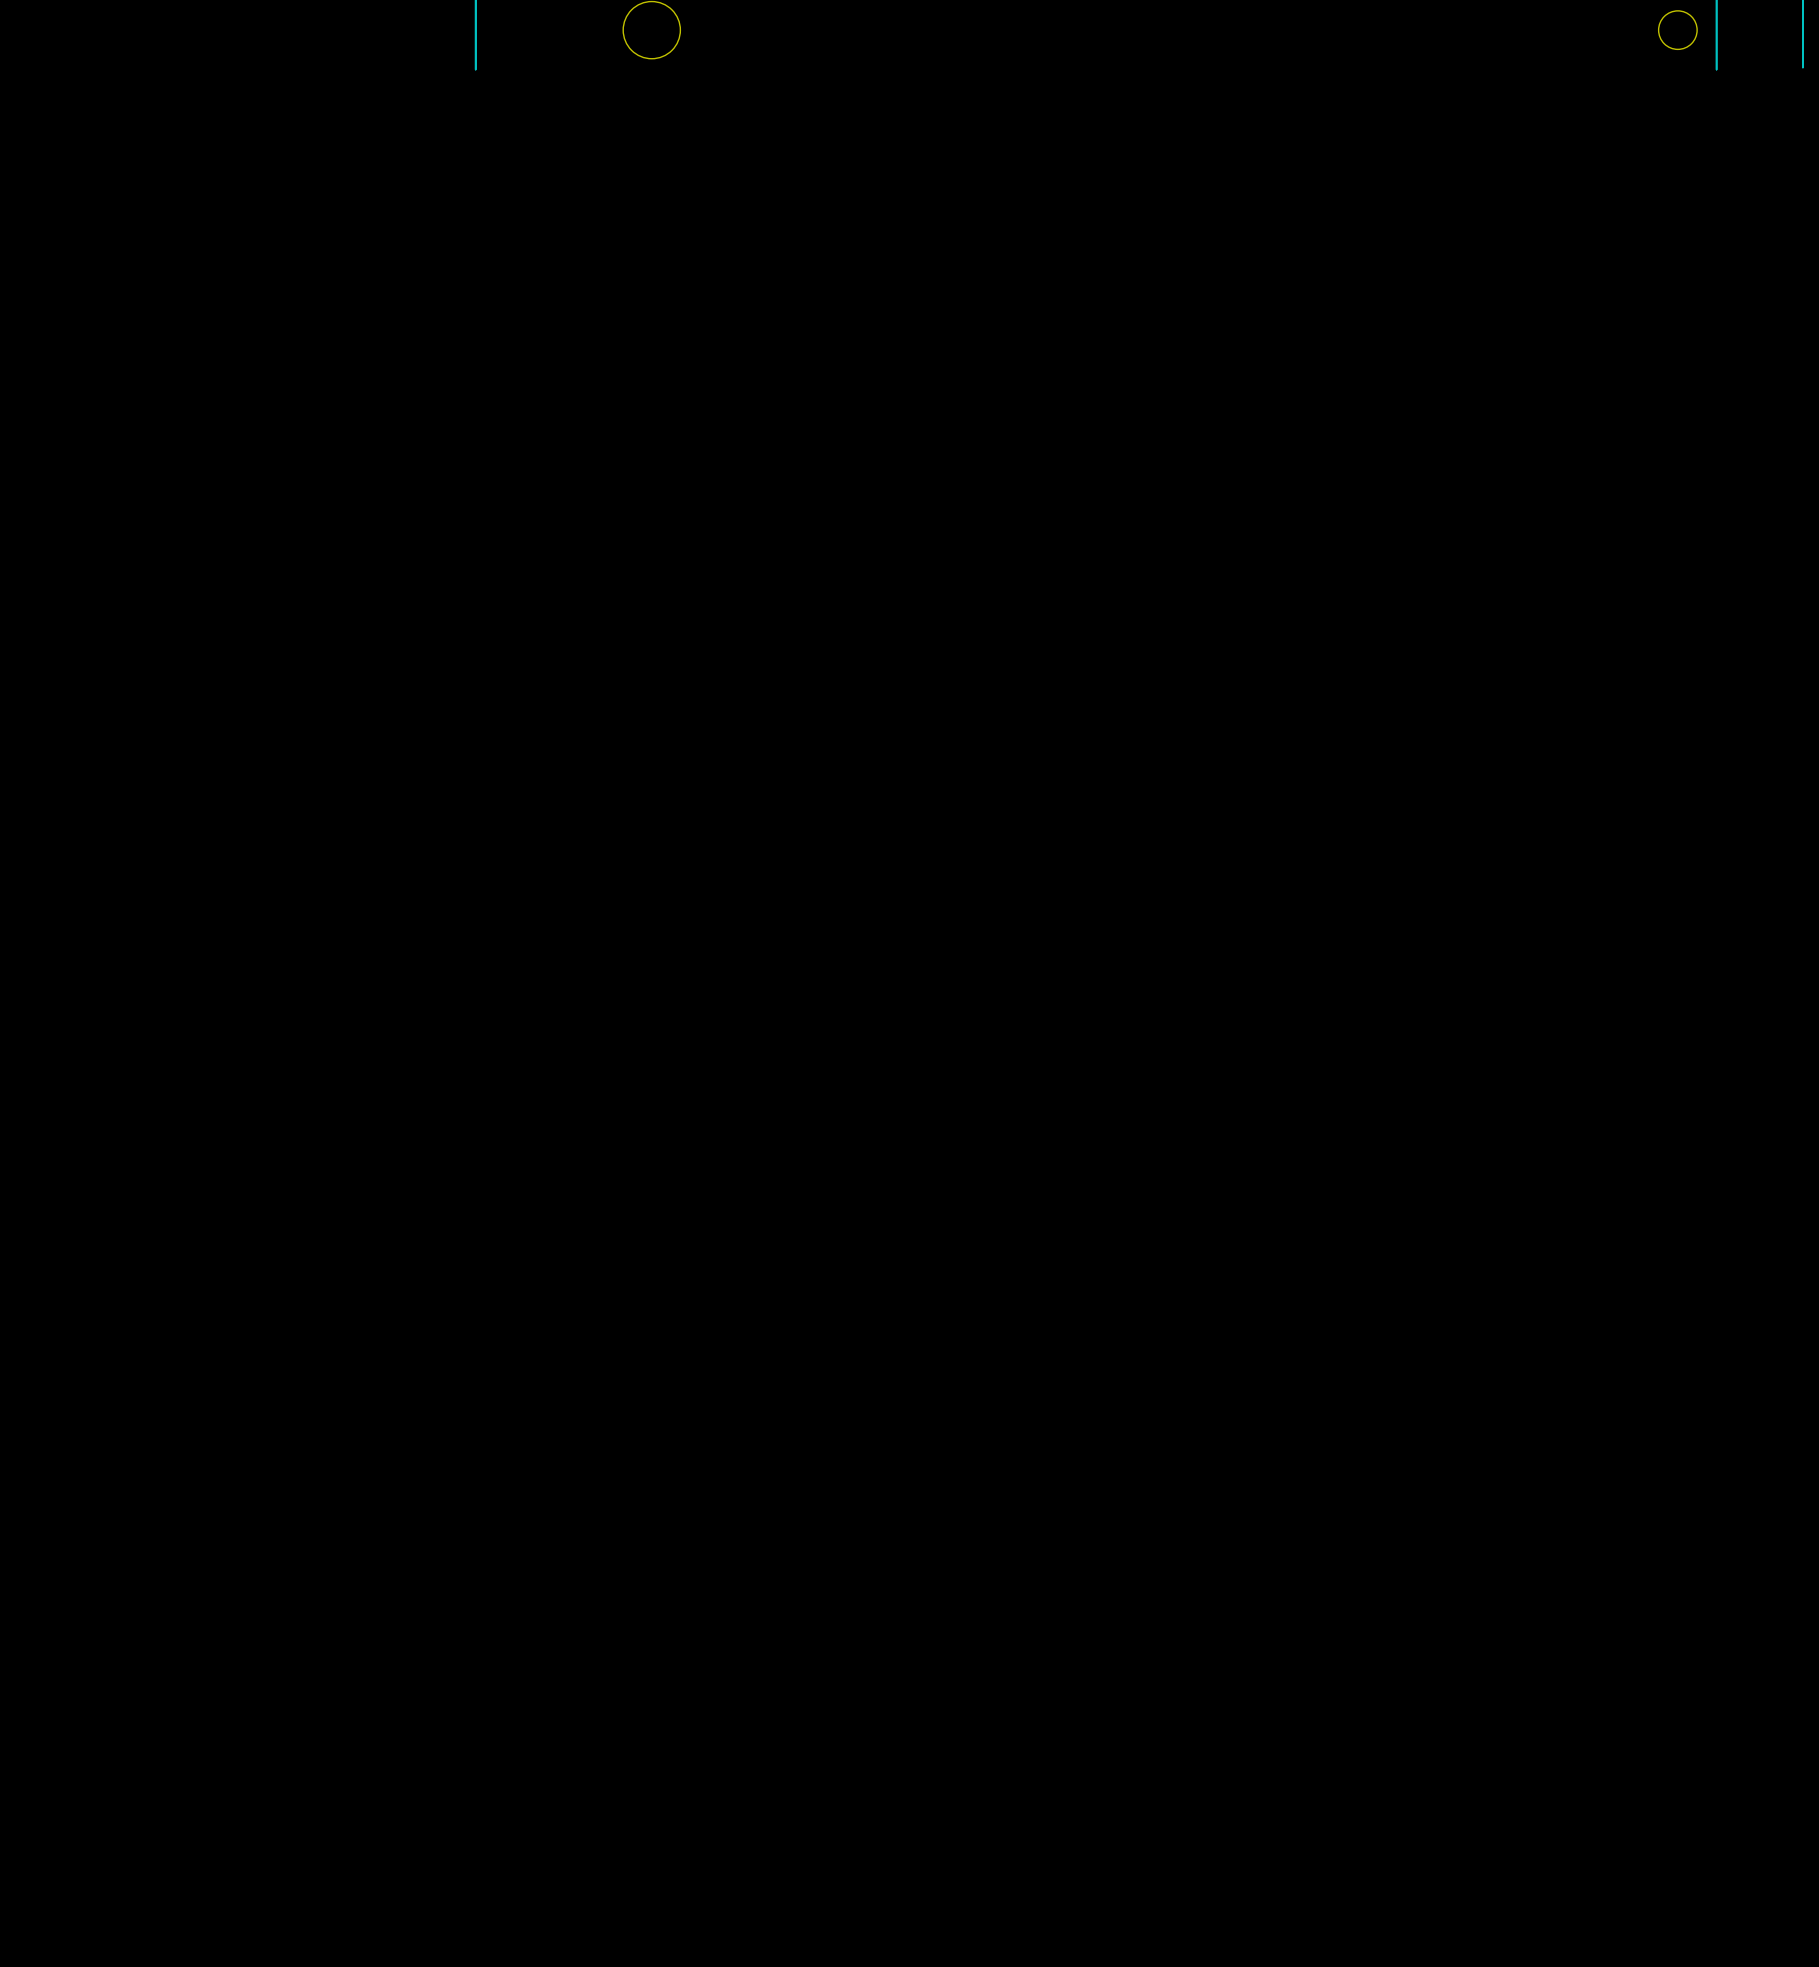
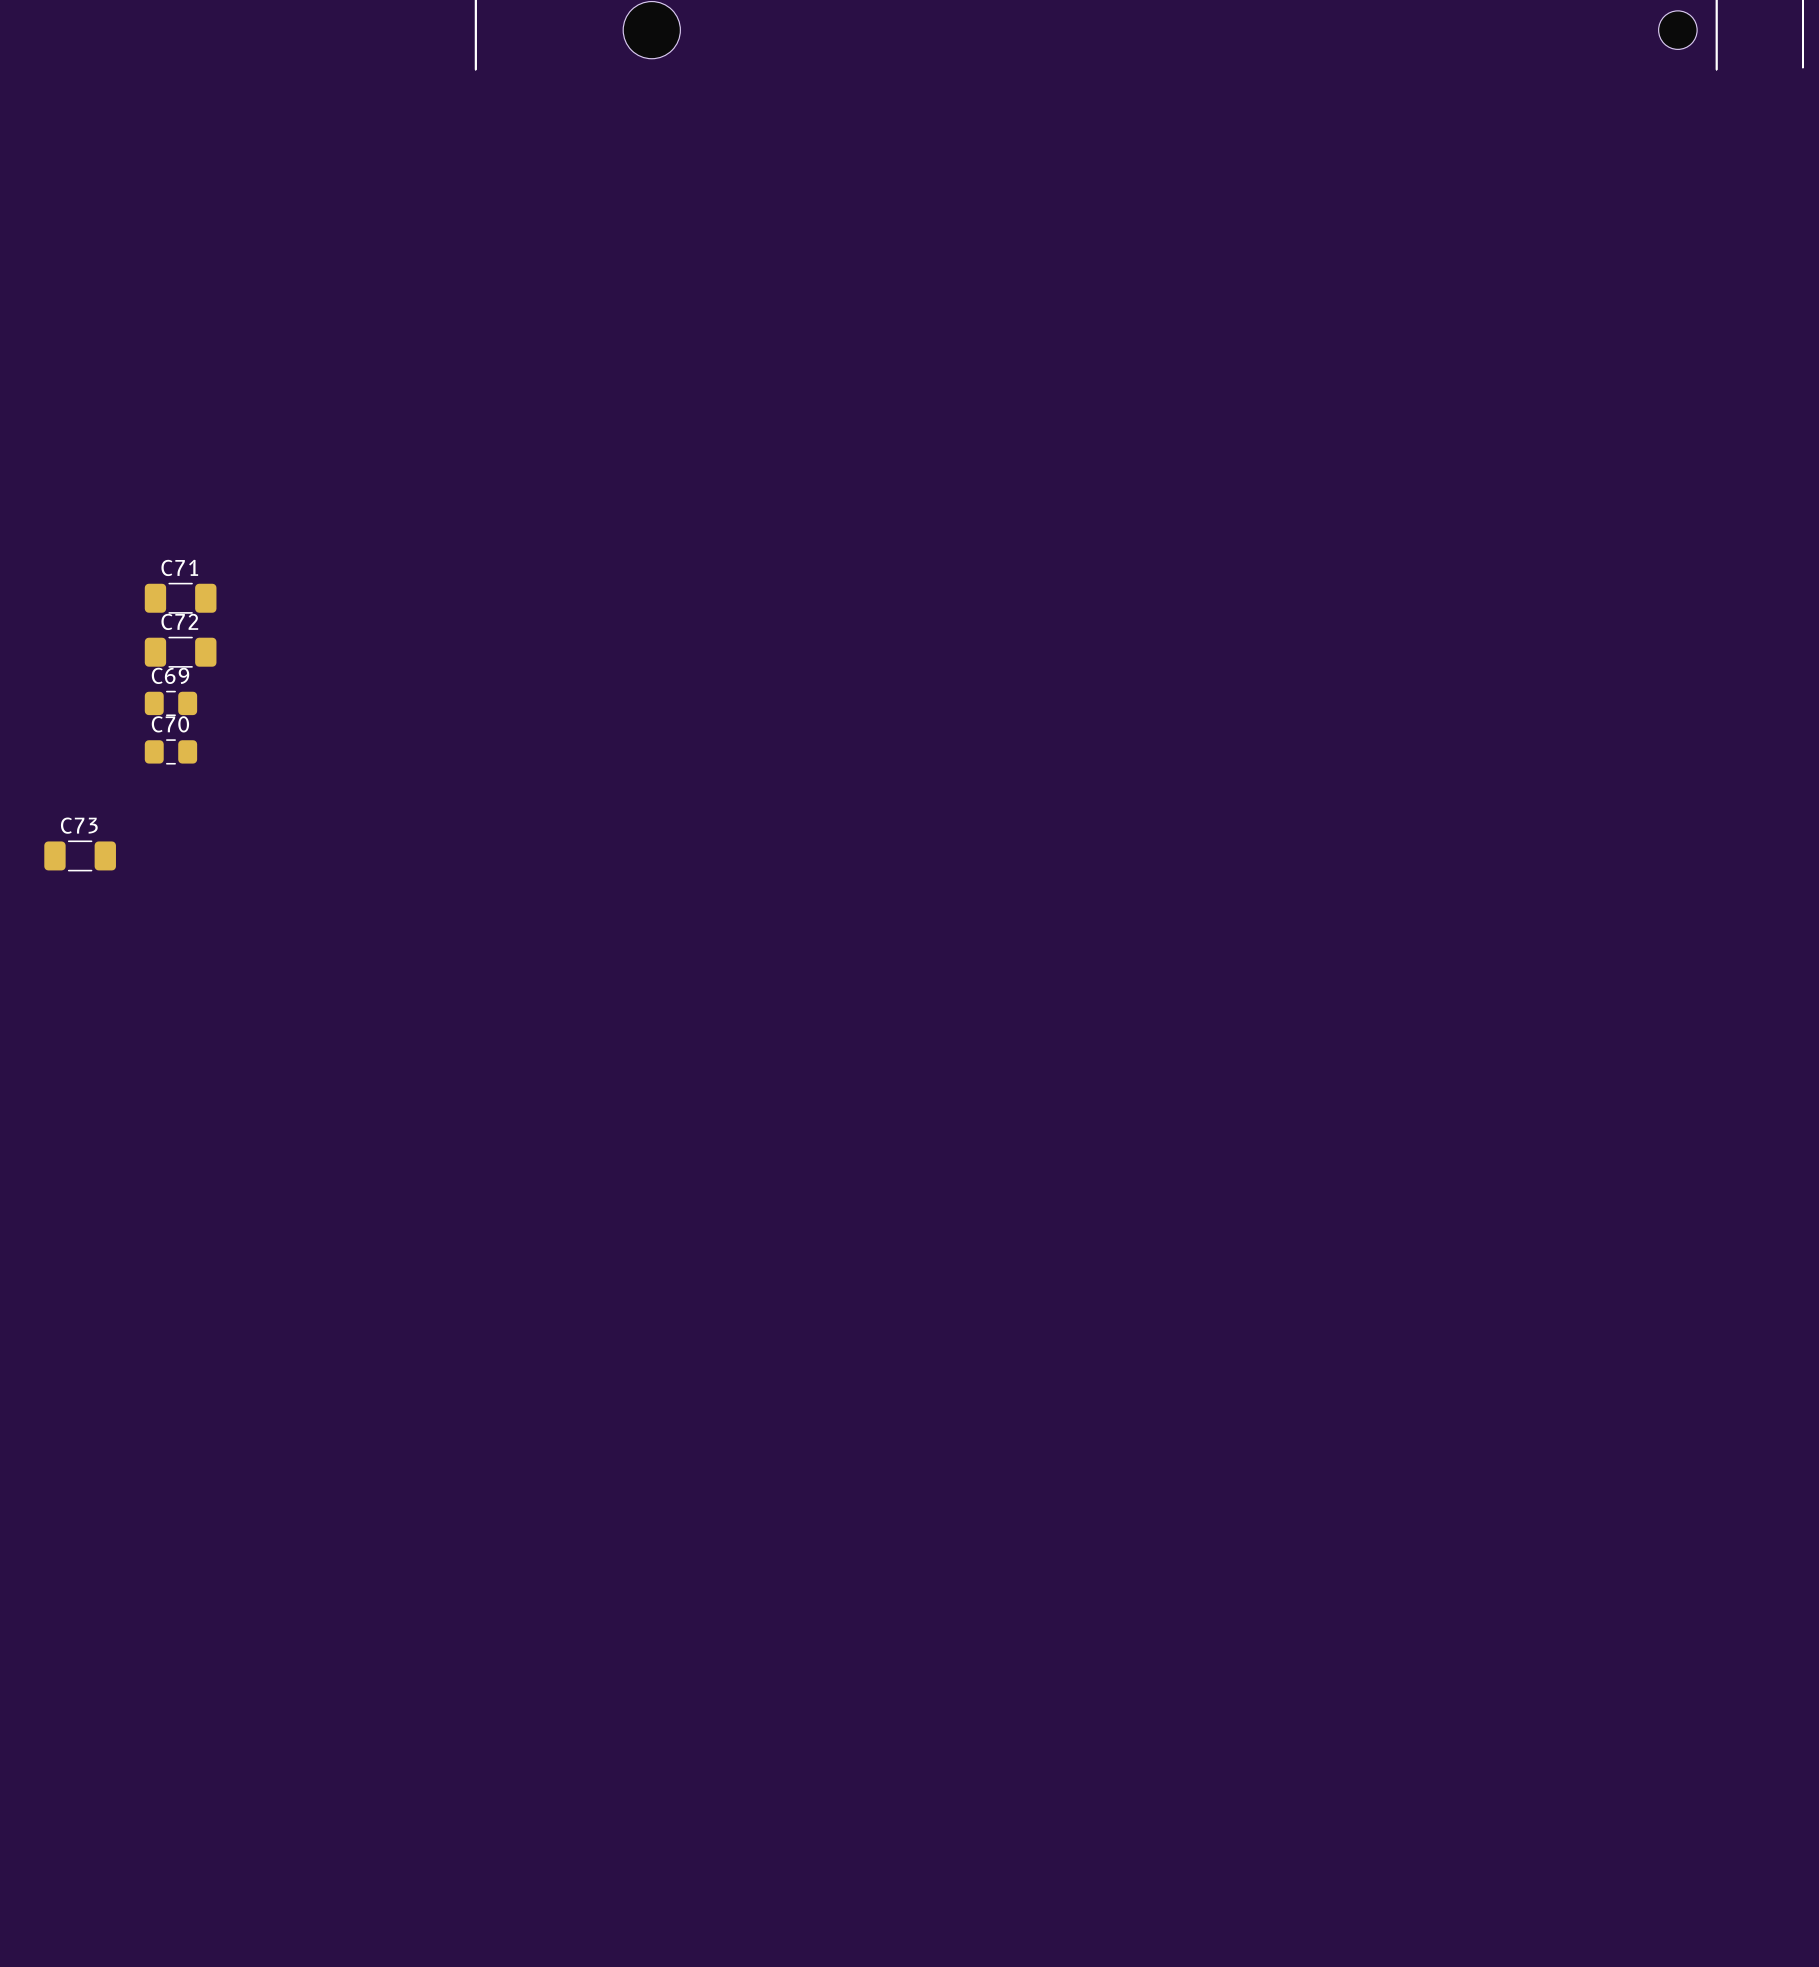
C71: none -> (180, 598)
C72: none -> (180, 652)
C69: none -> (170, 703)
C70: none -> (170, 751)
C73: none -> (80, 855)

